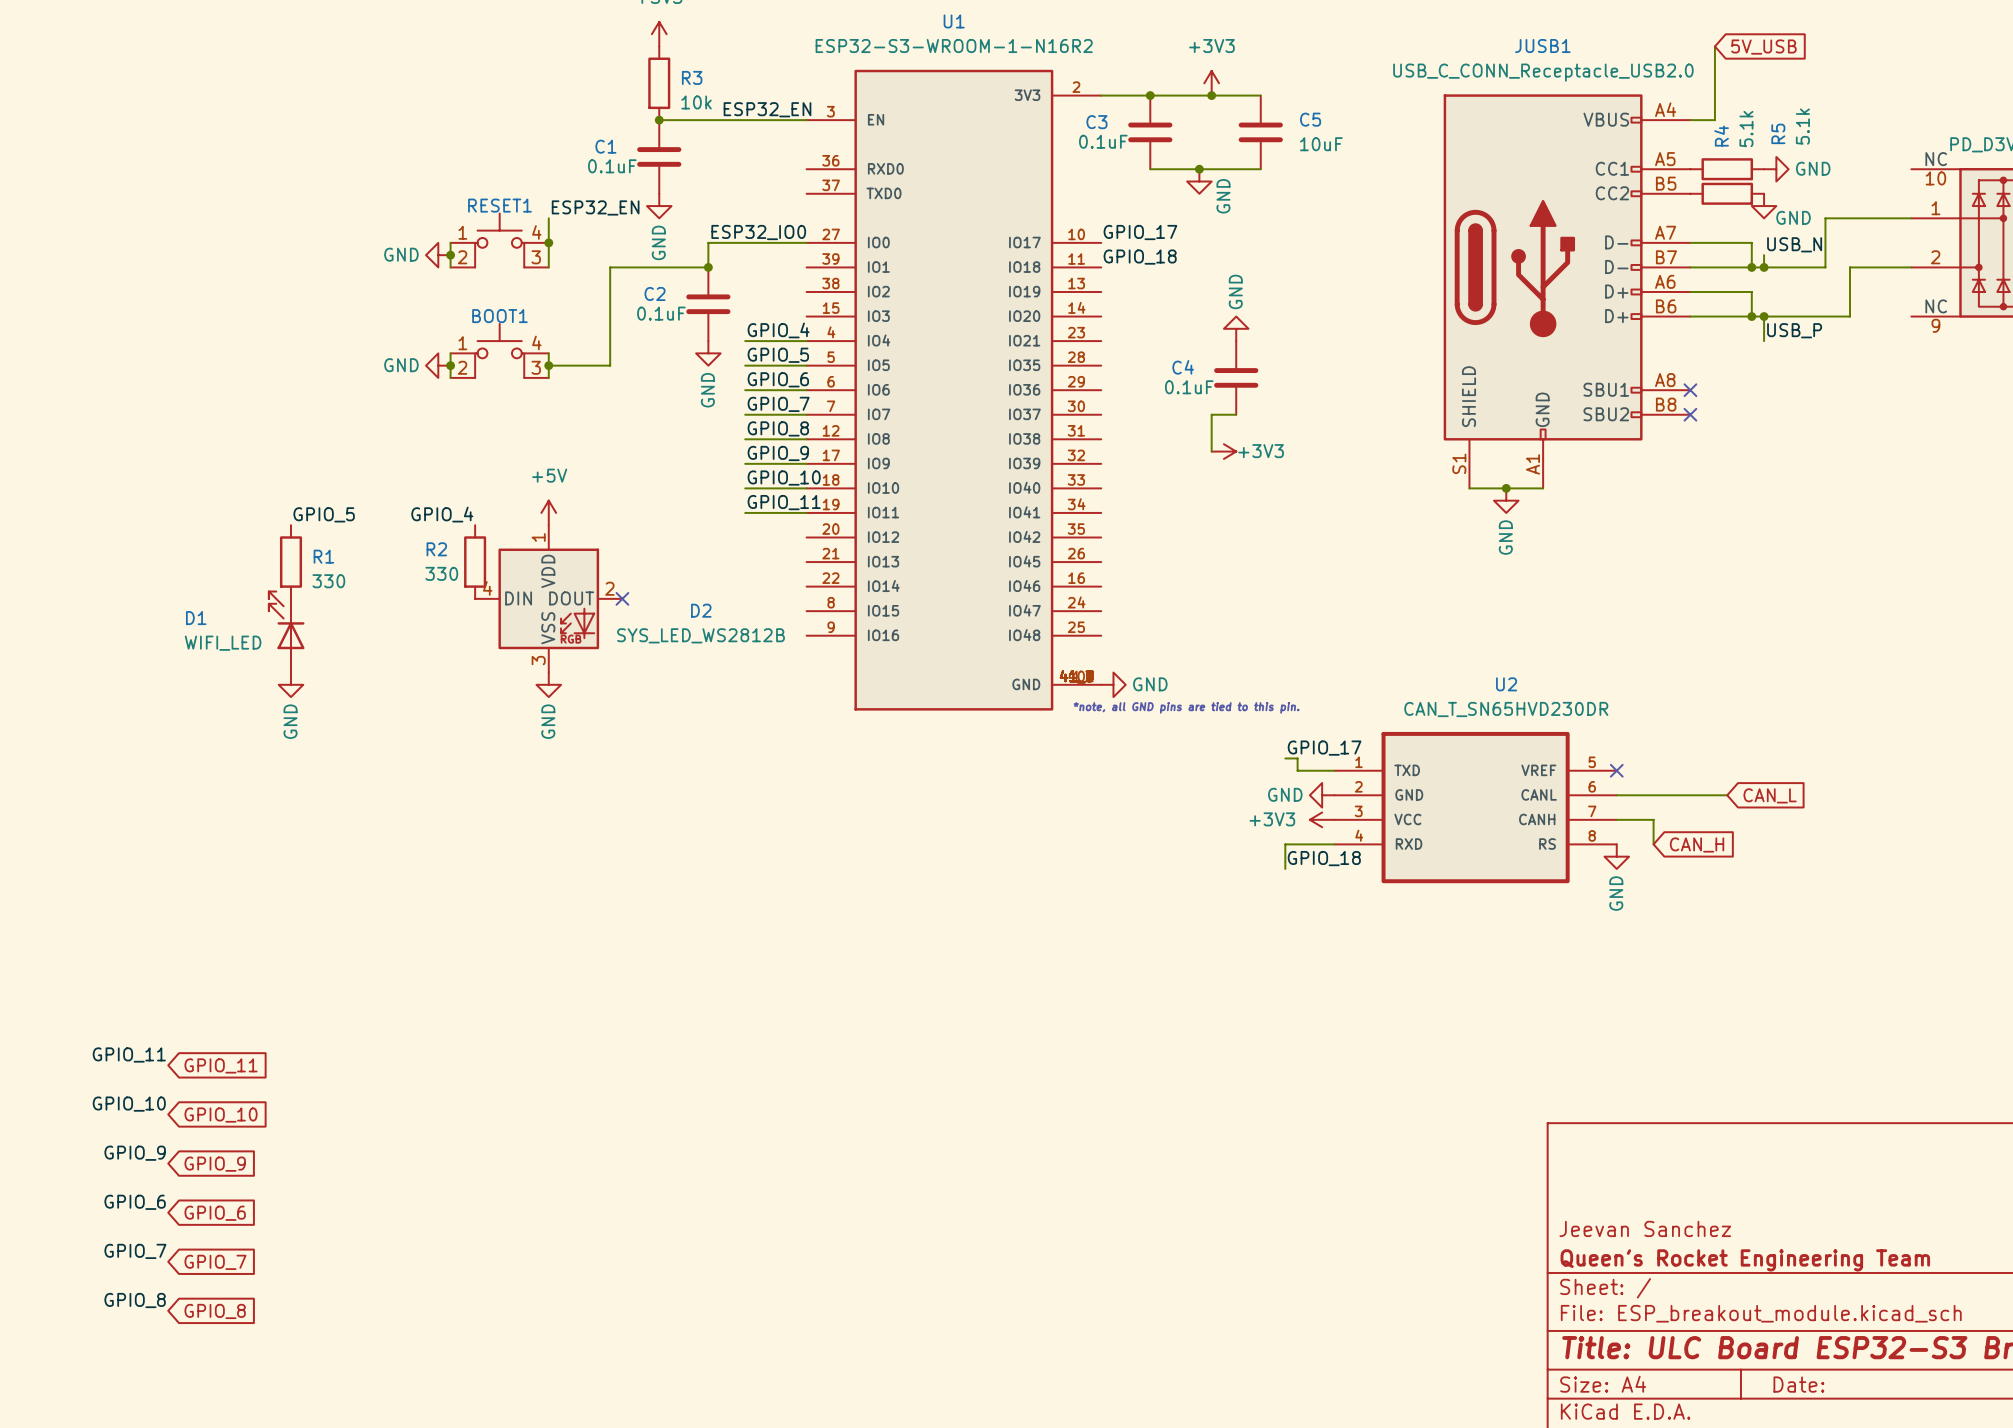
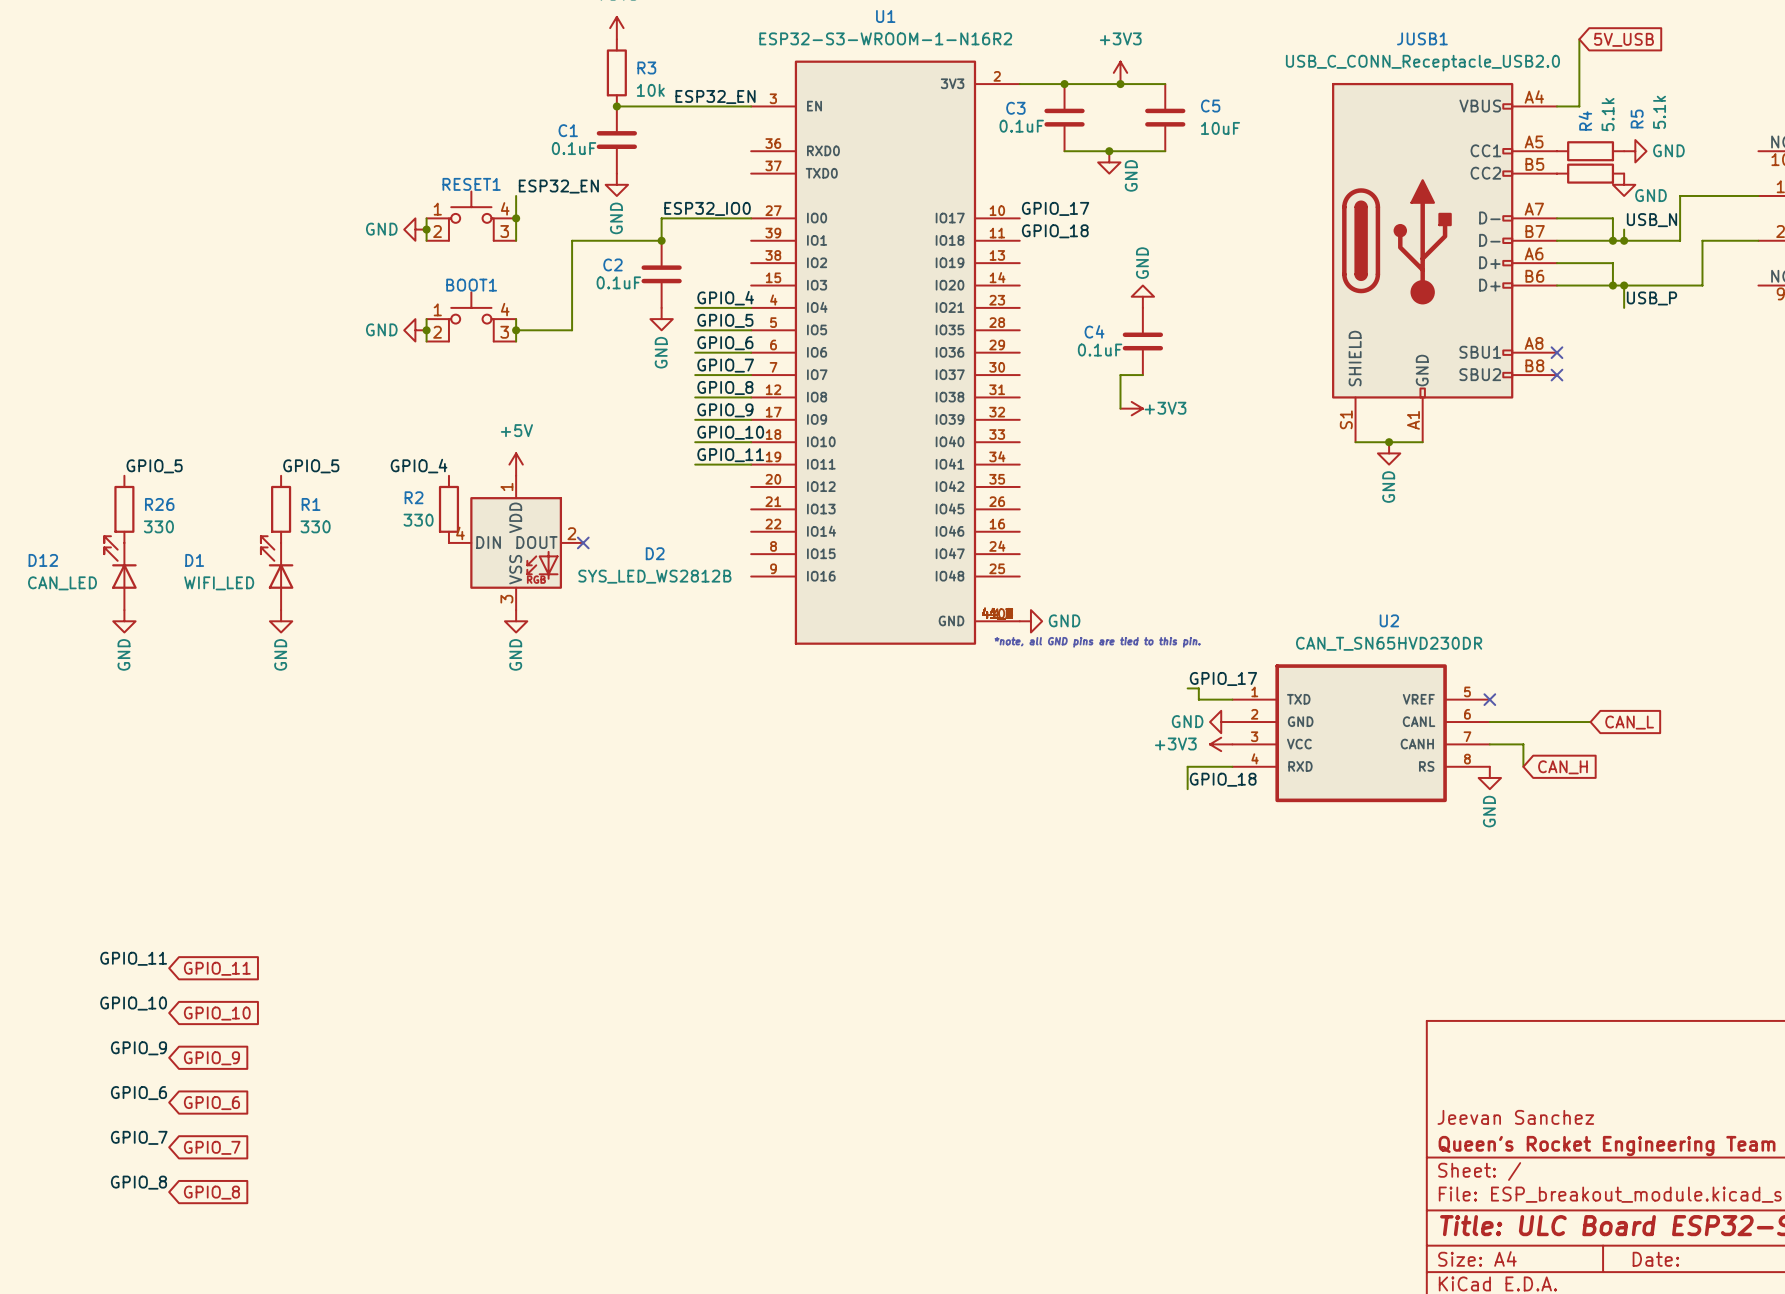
label: none -> GPIO_5 (154, 466)
R26: none -> 330 (124, 509)
D12: none -> CAN_LED (120, 573)
power symbol: none -> GND (124, 621)

